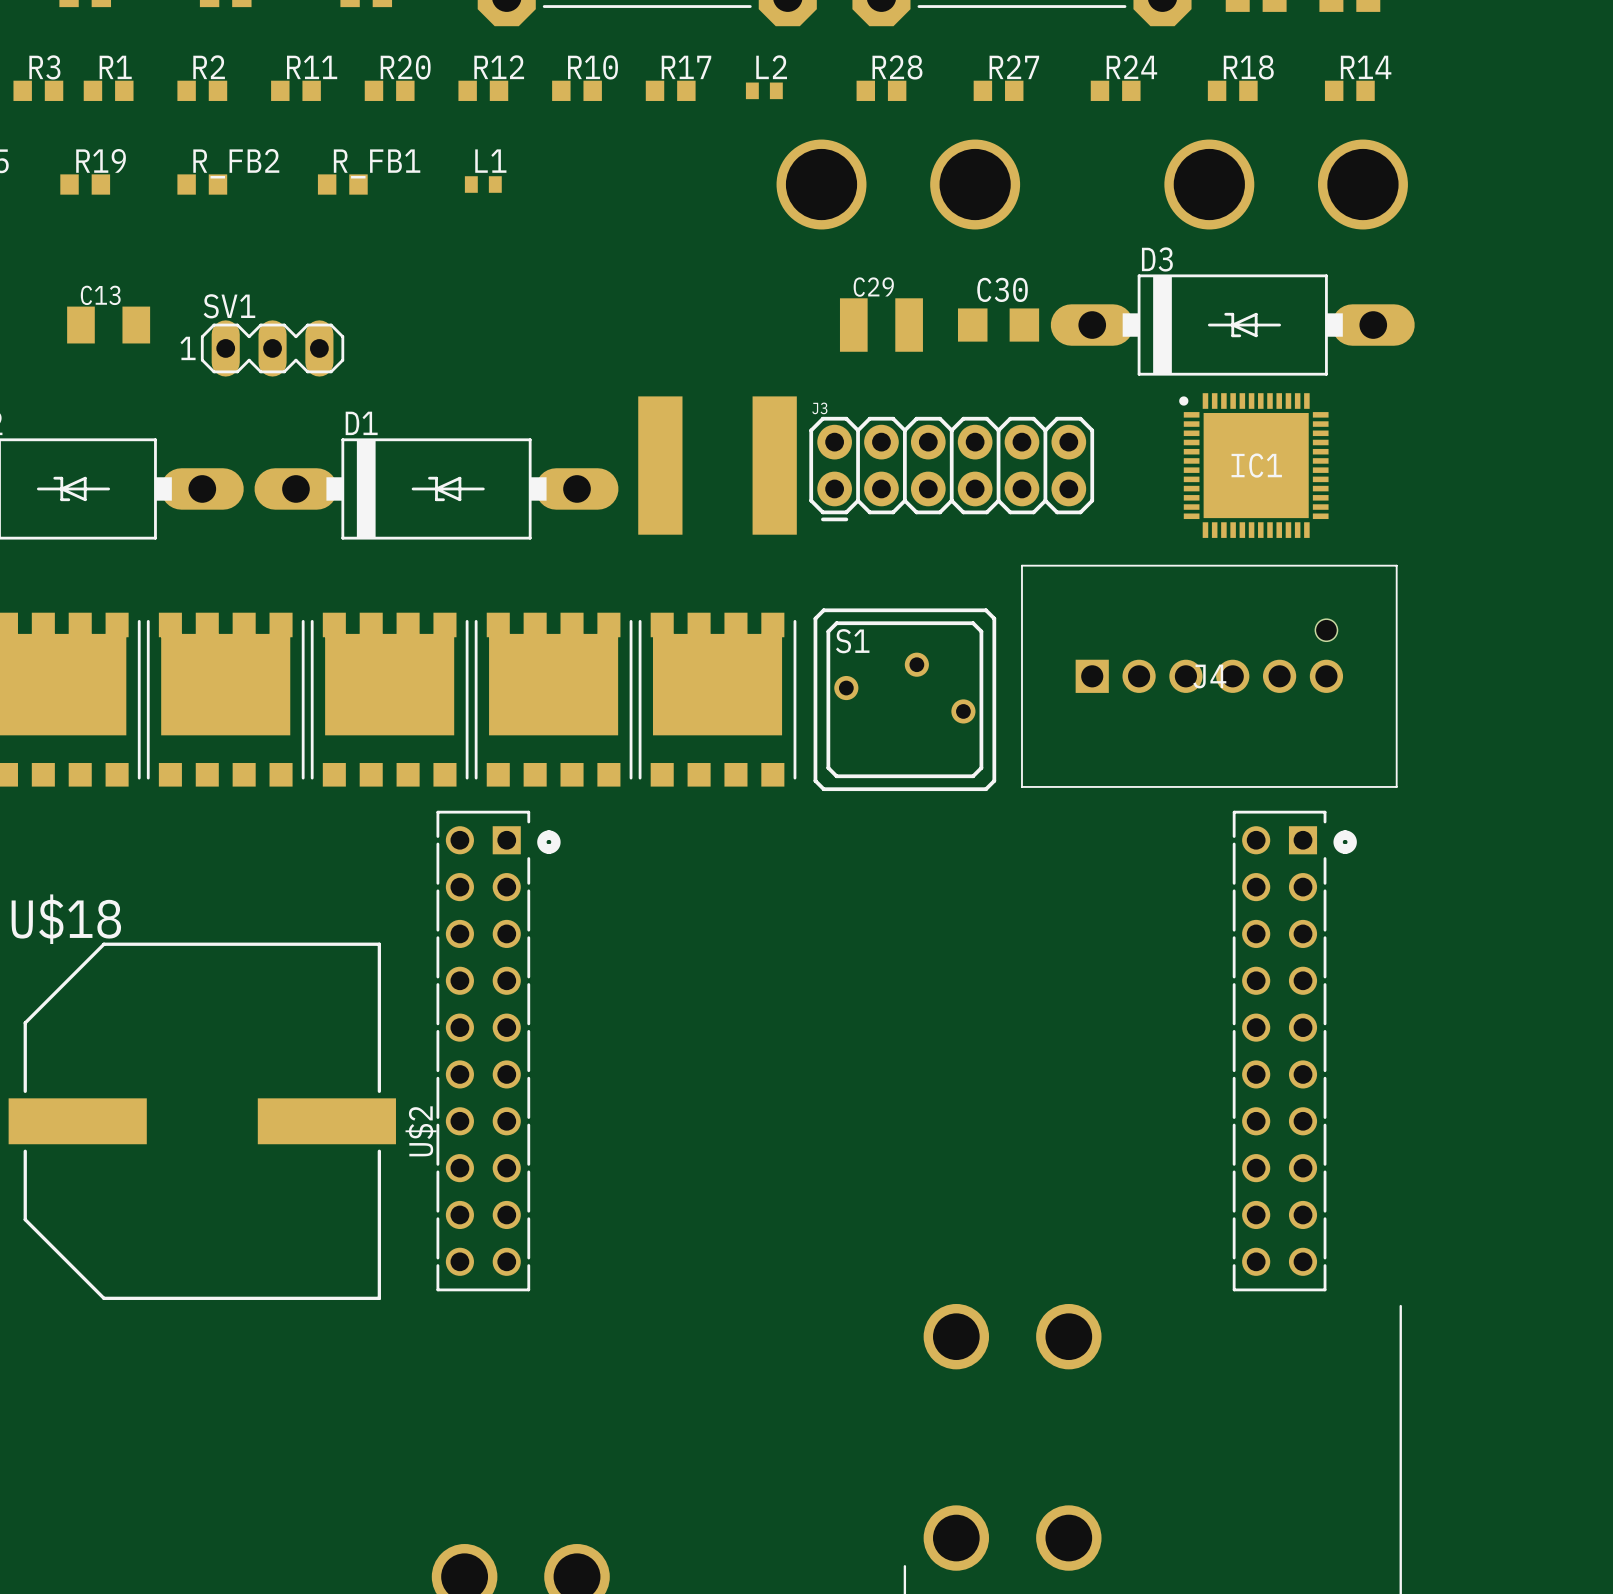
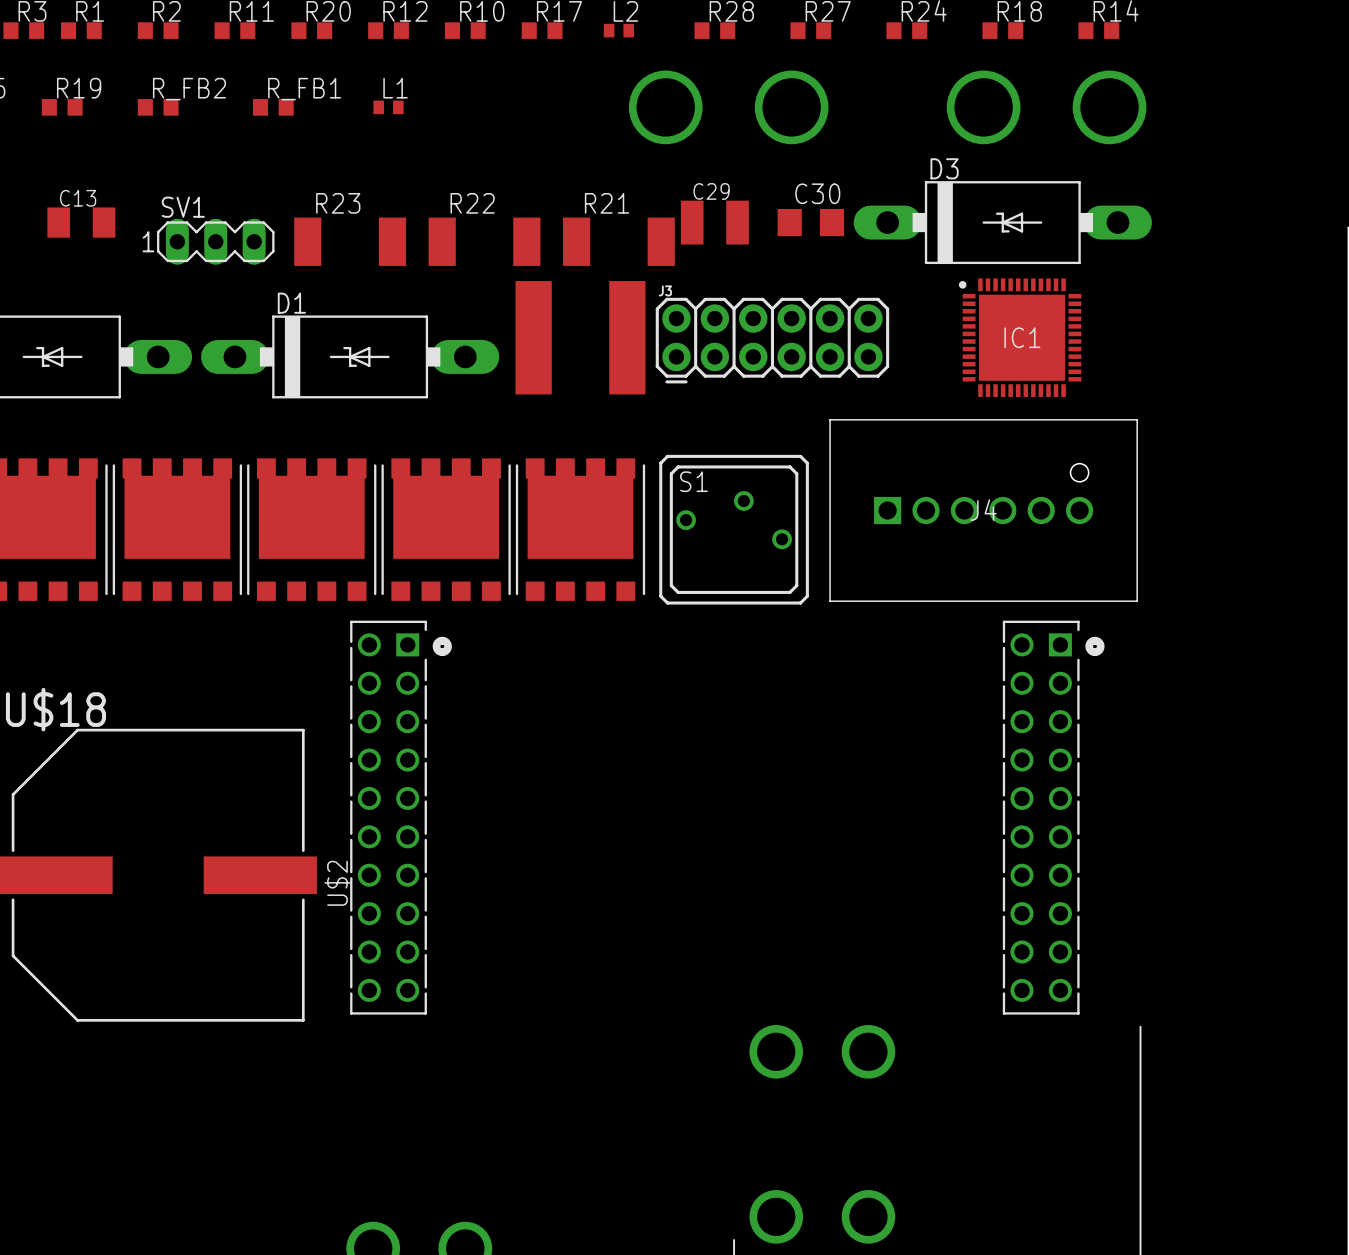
R23: none -> (350, 241)
R22: none -> (484, 241)
R21: none -> (618, 241)

